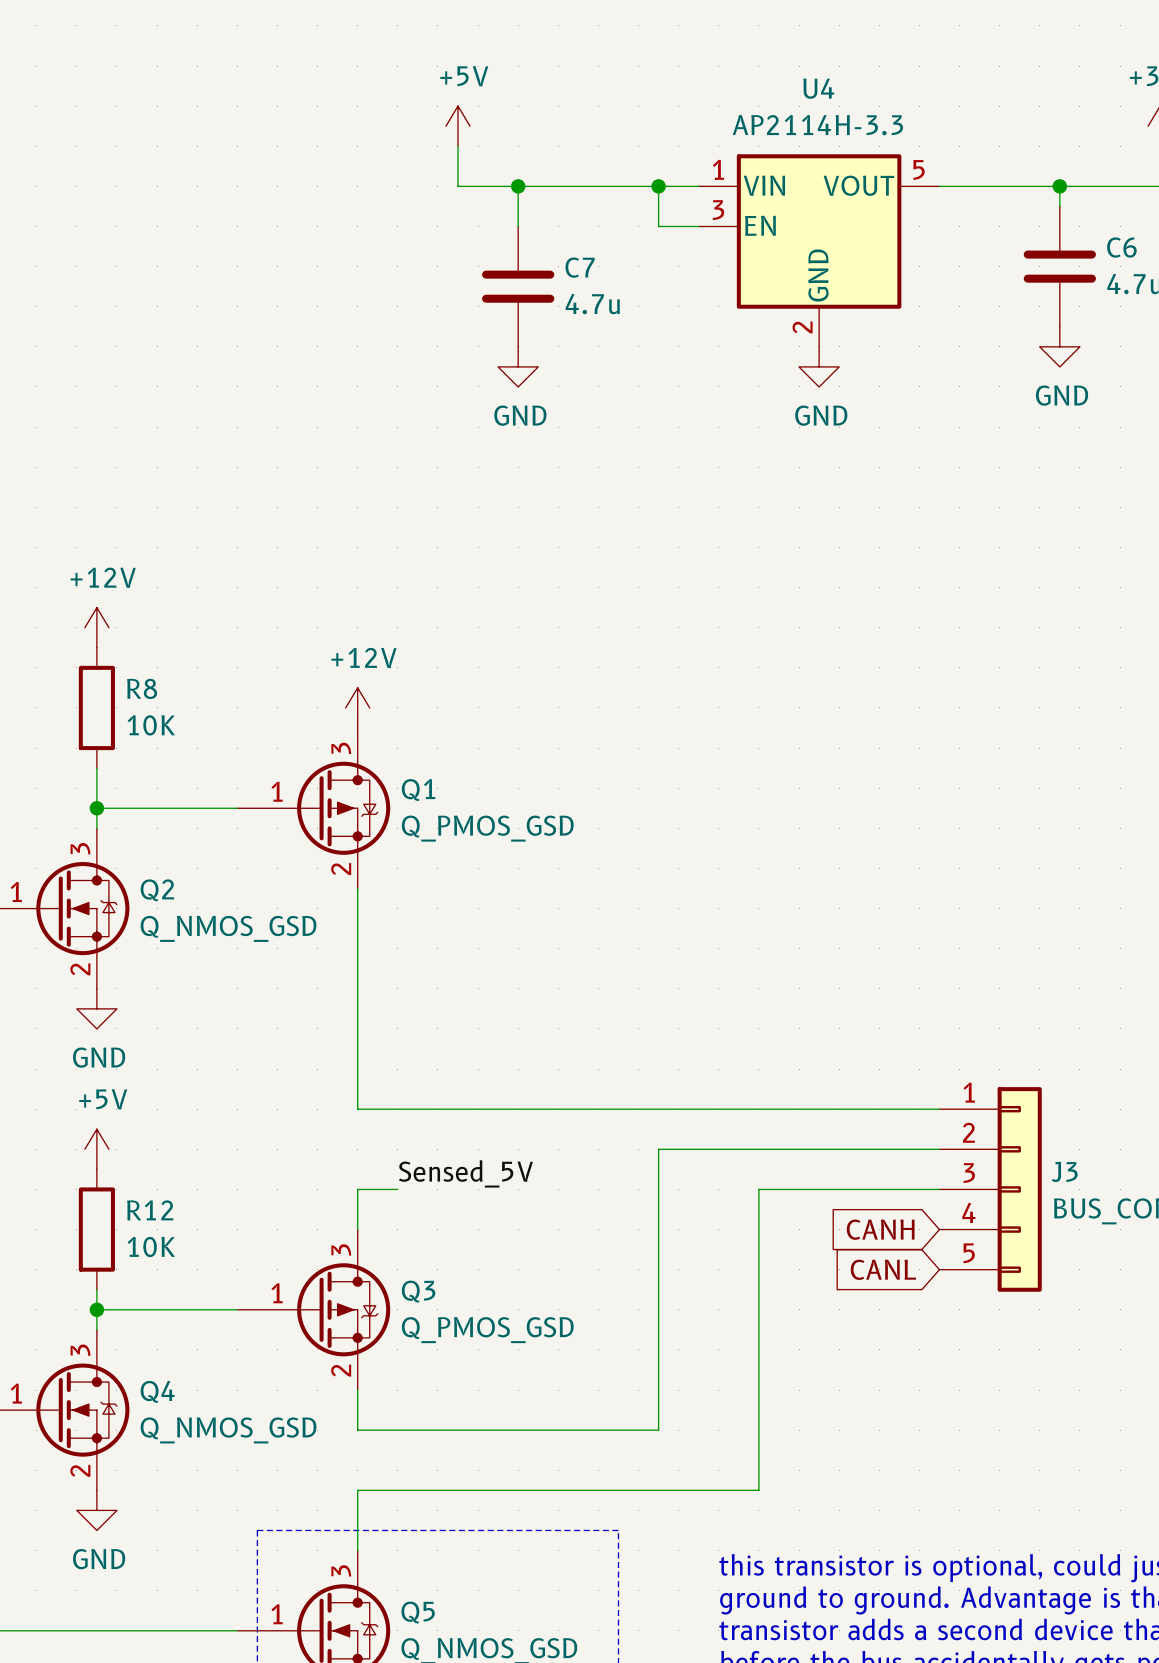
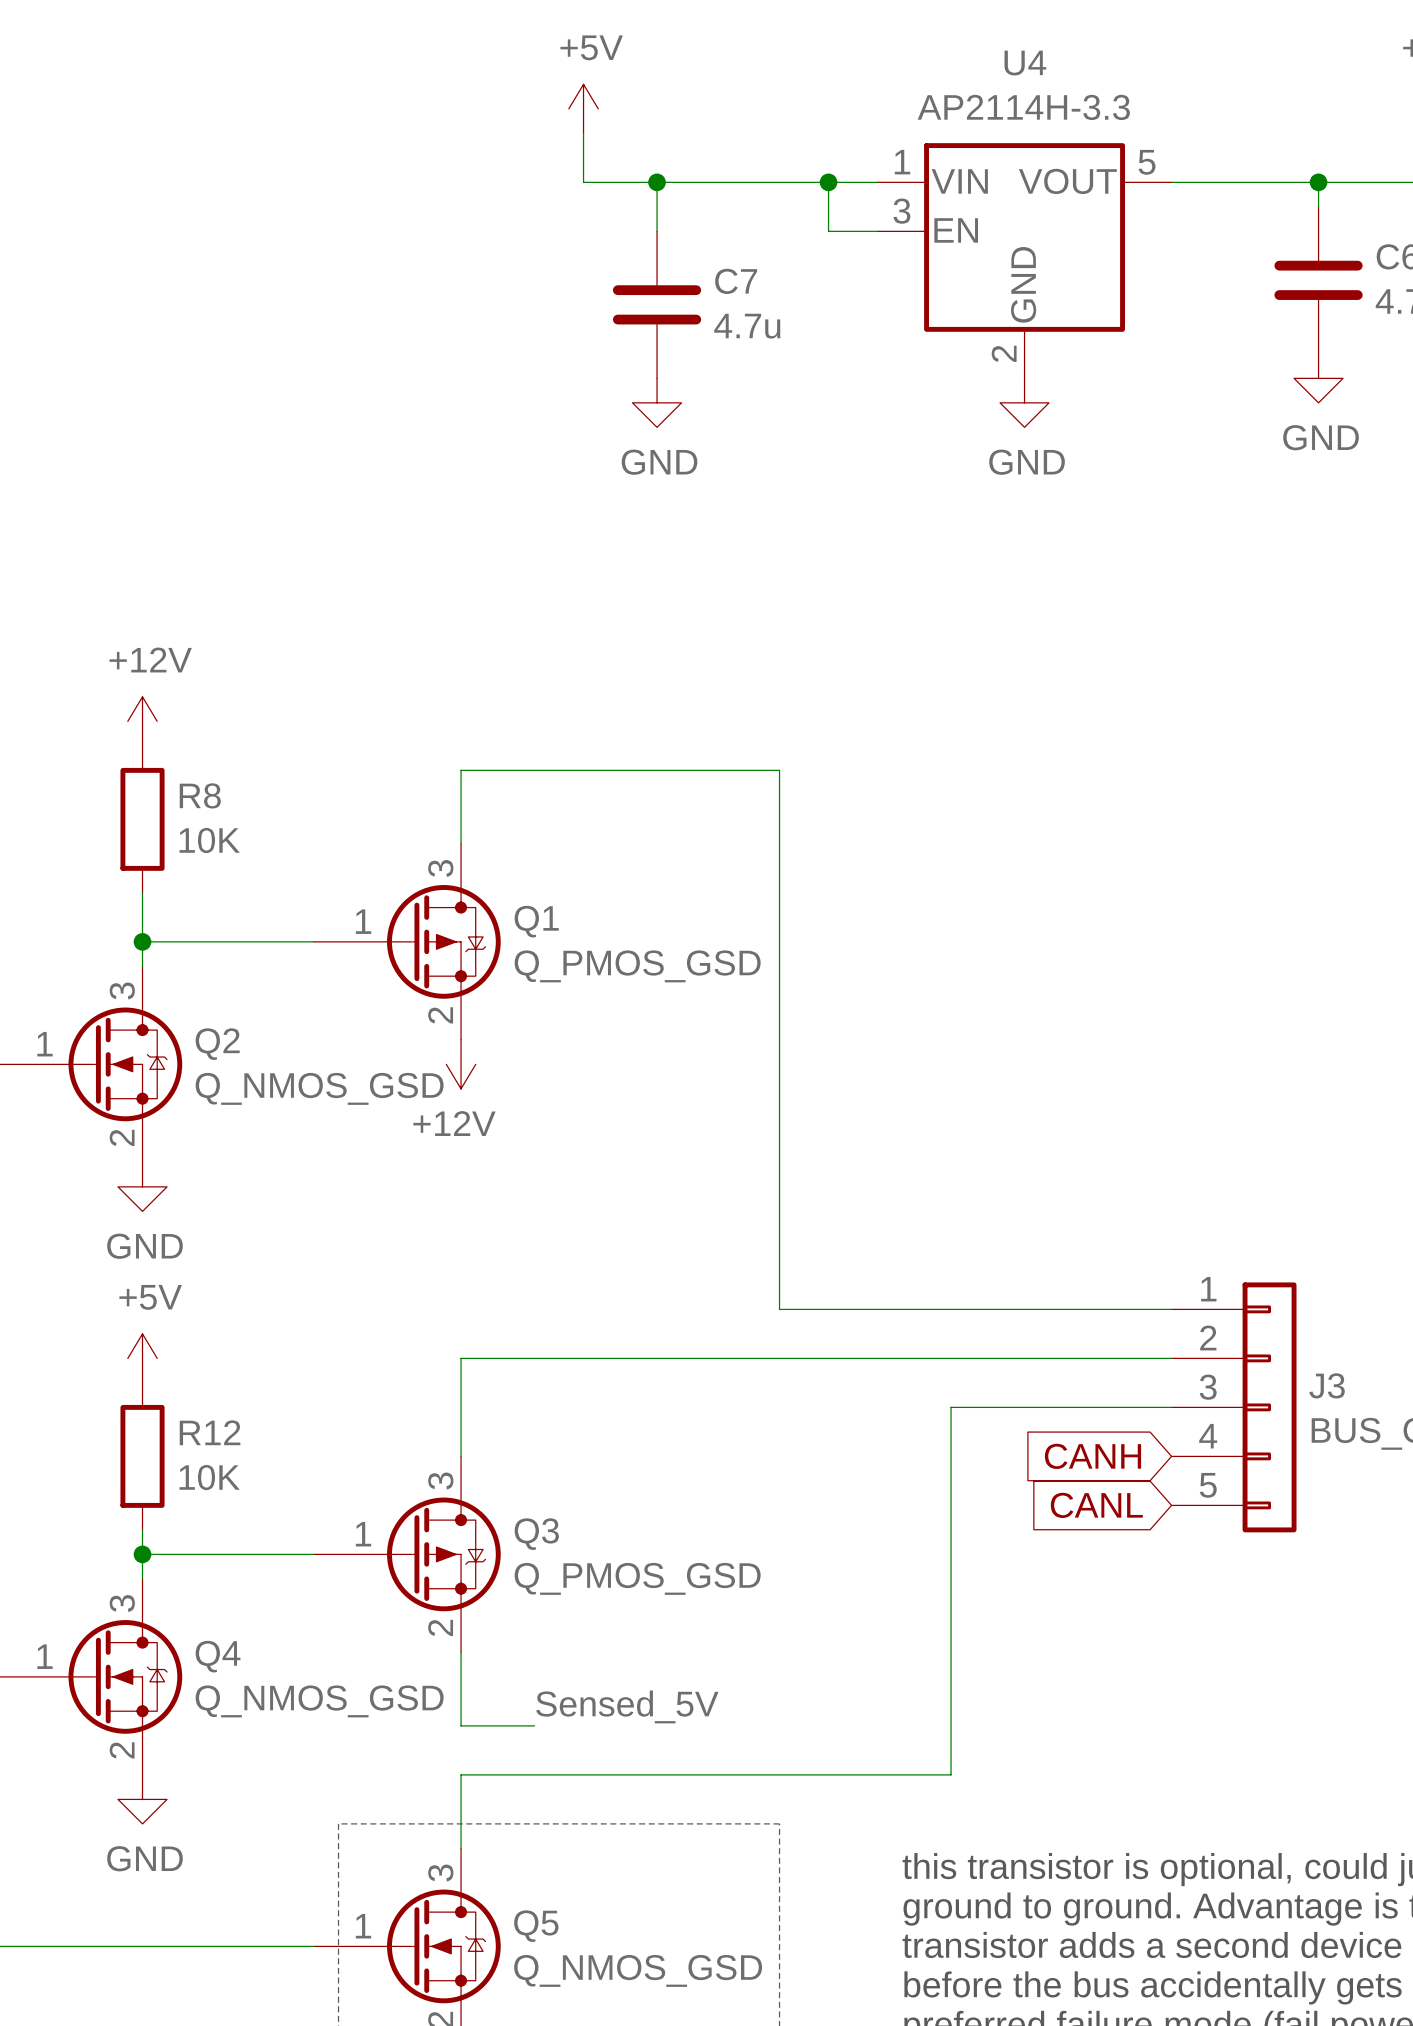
power symbol rotation: 0° (357, 707) -> 180° (461, 1064)
power symbol position: +12V (357, 707) -> +12V (461, 1064)
wire: (357, 888) (357, 1109) (618, 1109) -> (461, 843) (461, 770) (779, 770) (779, 1309)
wire: (658, 1149) (658, 1430) (357, 1430) -> (828, 1358) (461, 1358) (461, 1407)
label position: Sensed_5V (465, 1173) -> Sensed_5V (627, 1706)
wire: (357, 1189) (397, 1189) -> none
wire: none -> (461, 1701) (461, 1725) (534, 1725)

